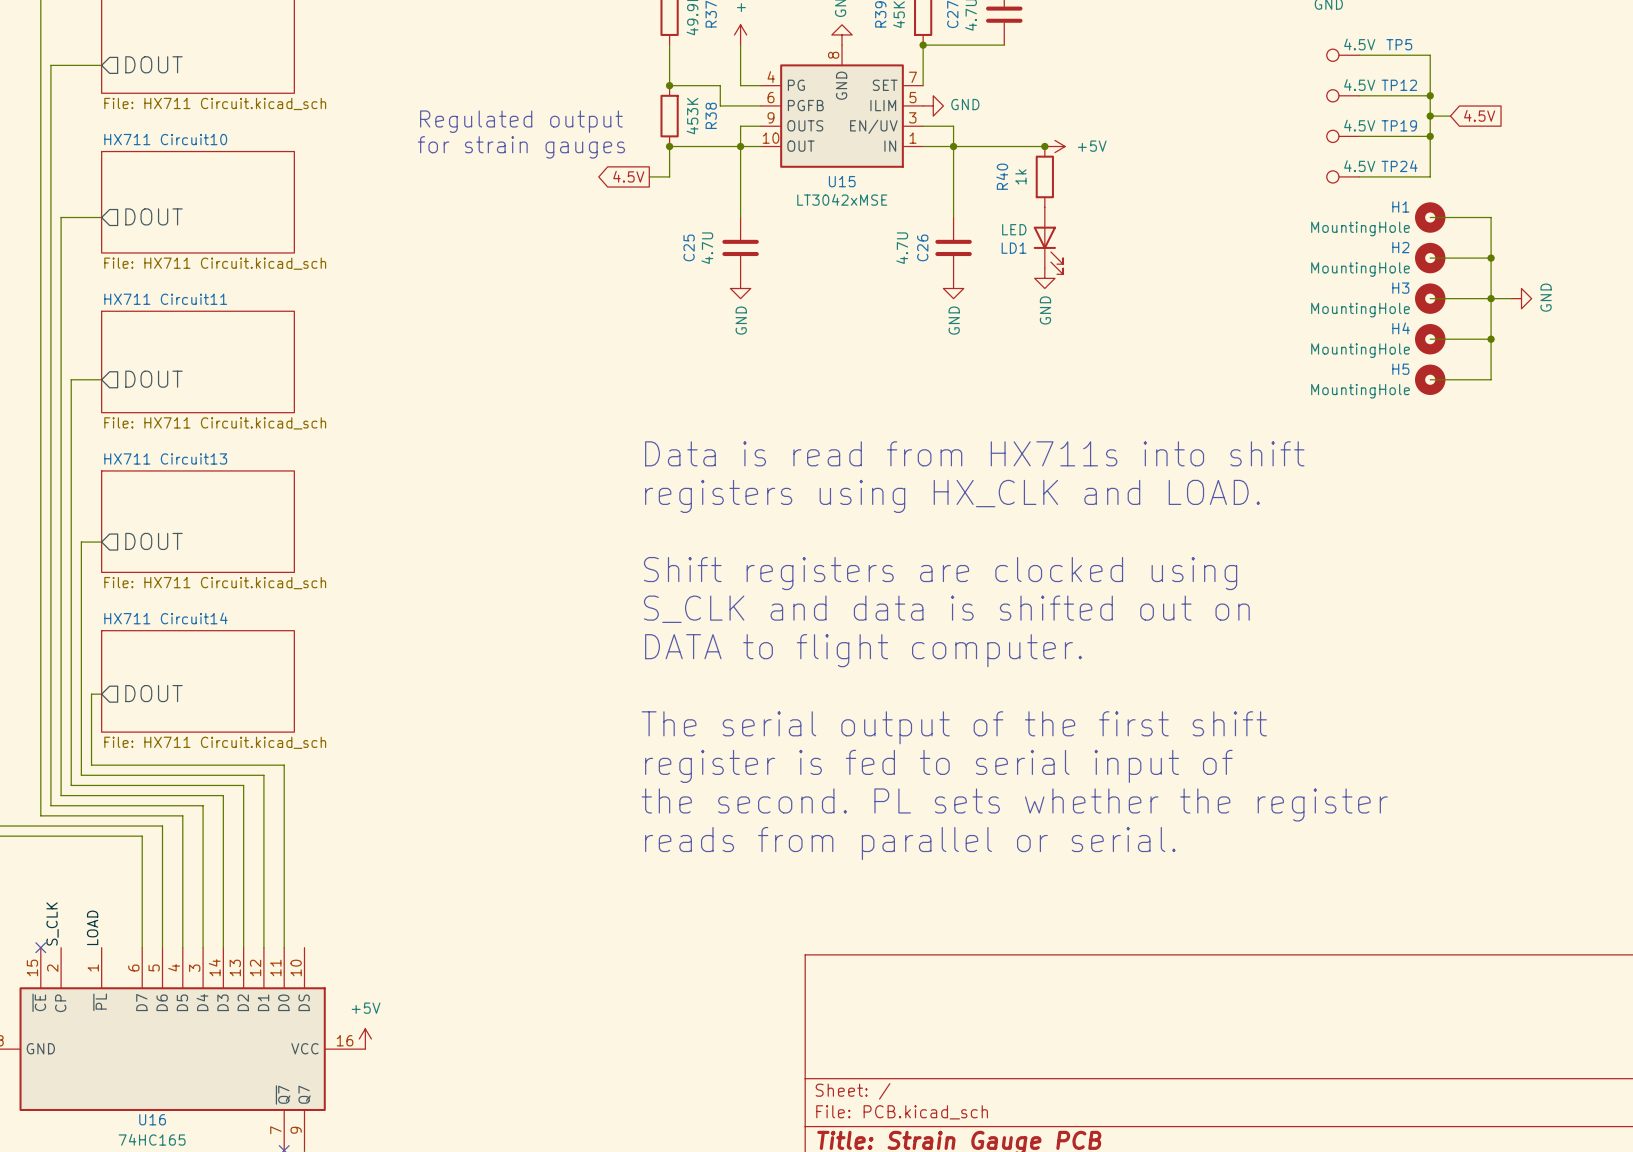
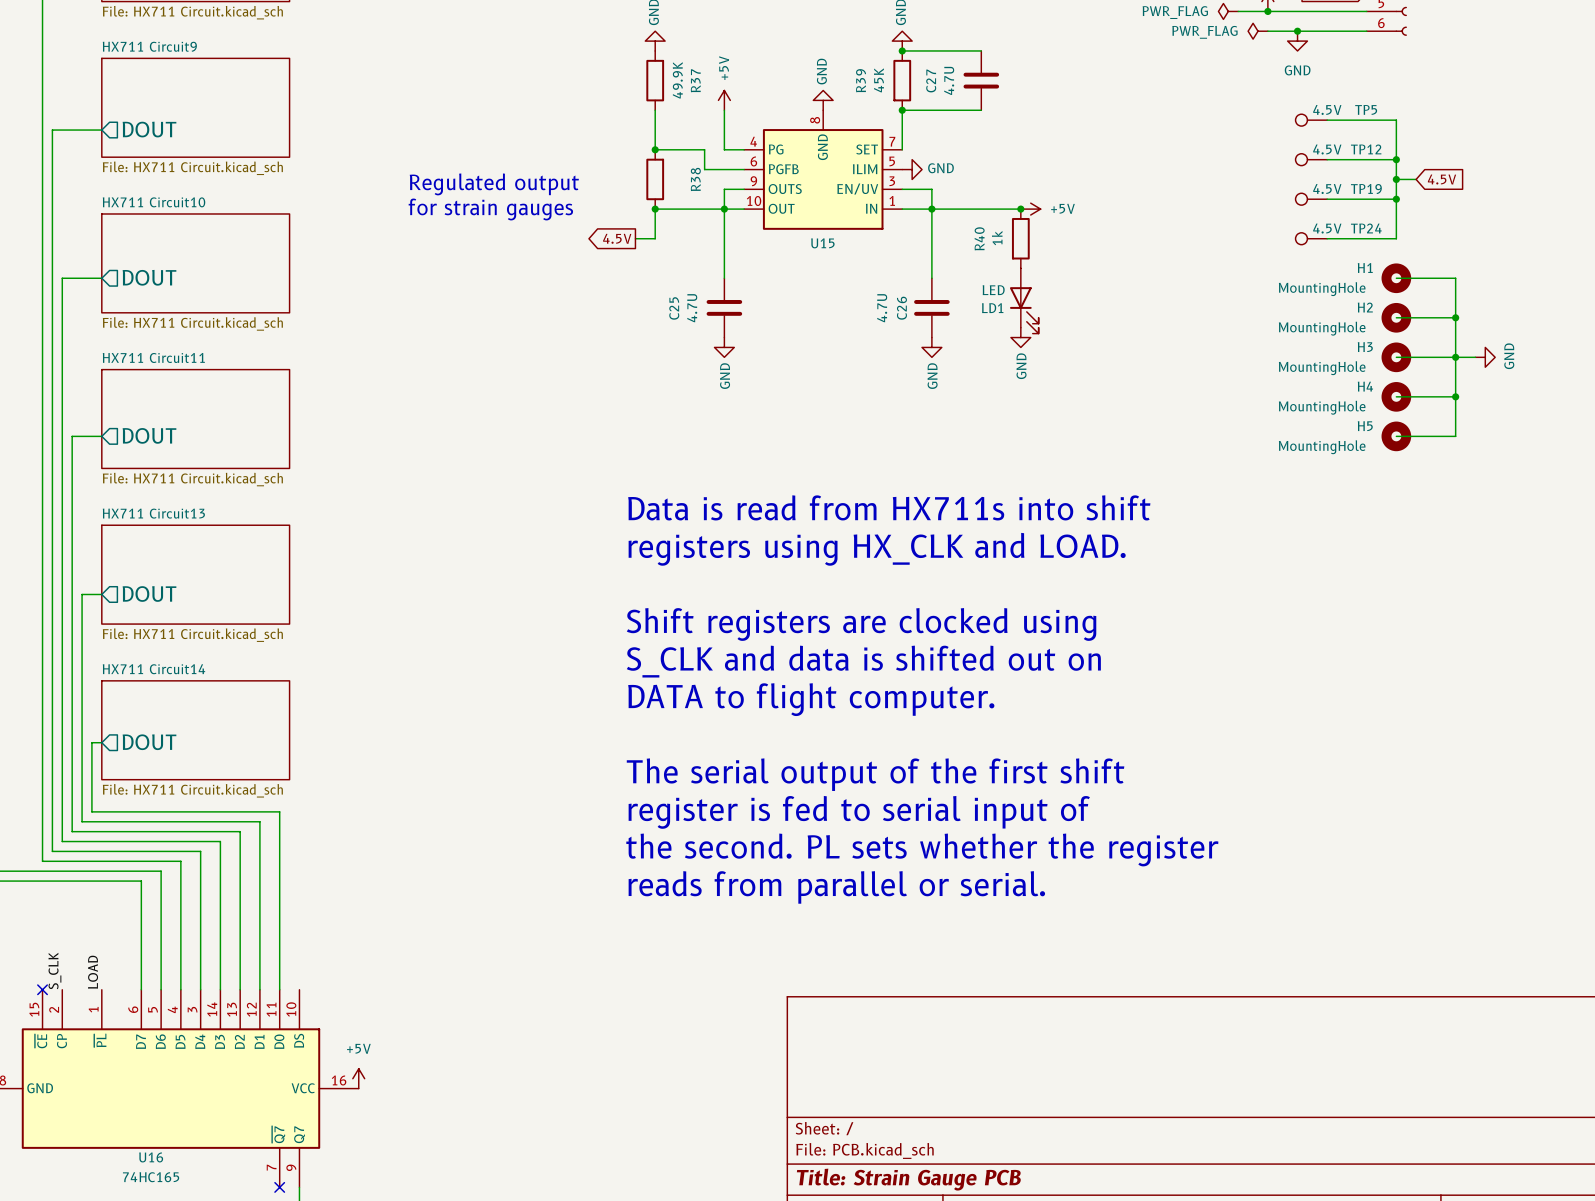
R38 value: 453K (692, 116) -> none
U15 value: LT3042xMSE (842, 199) -> none

